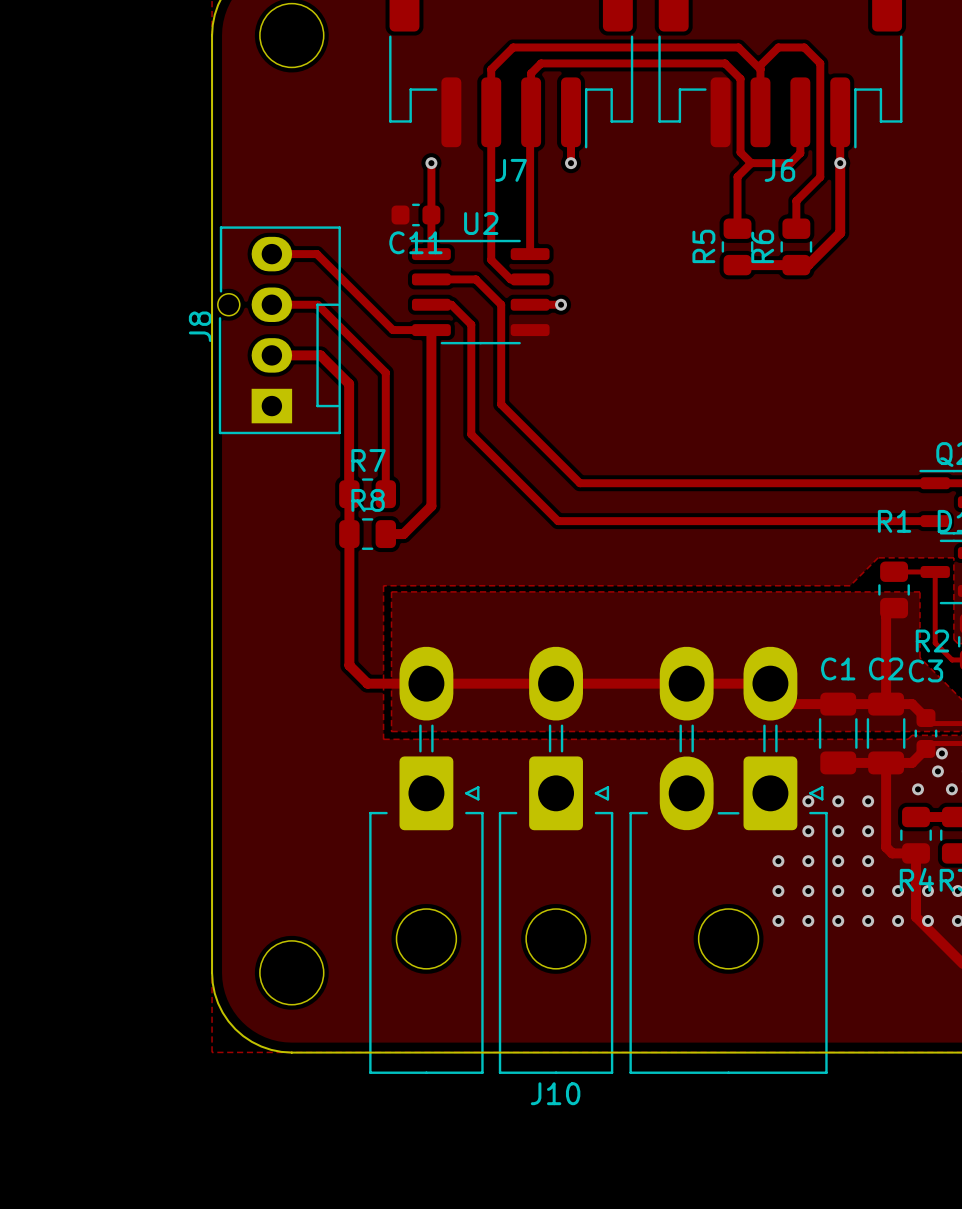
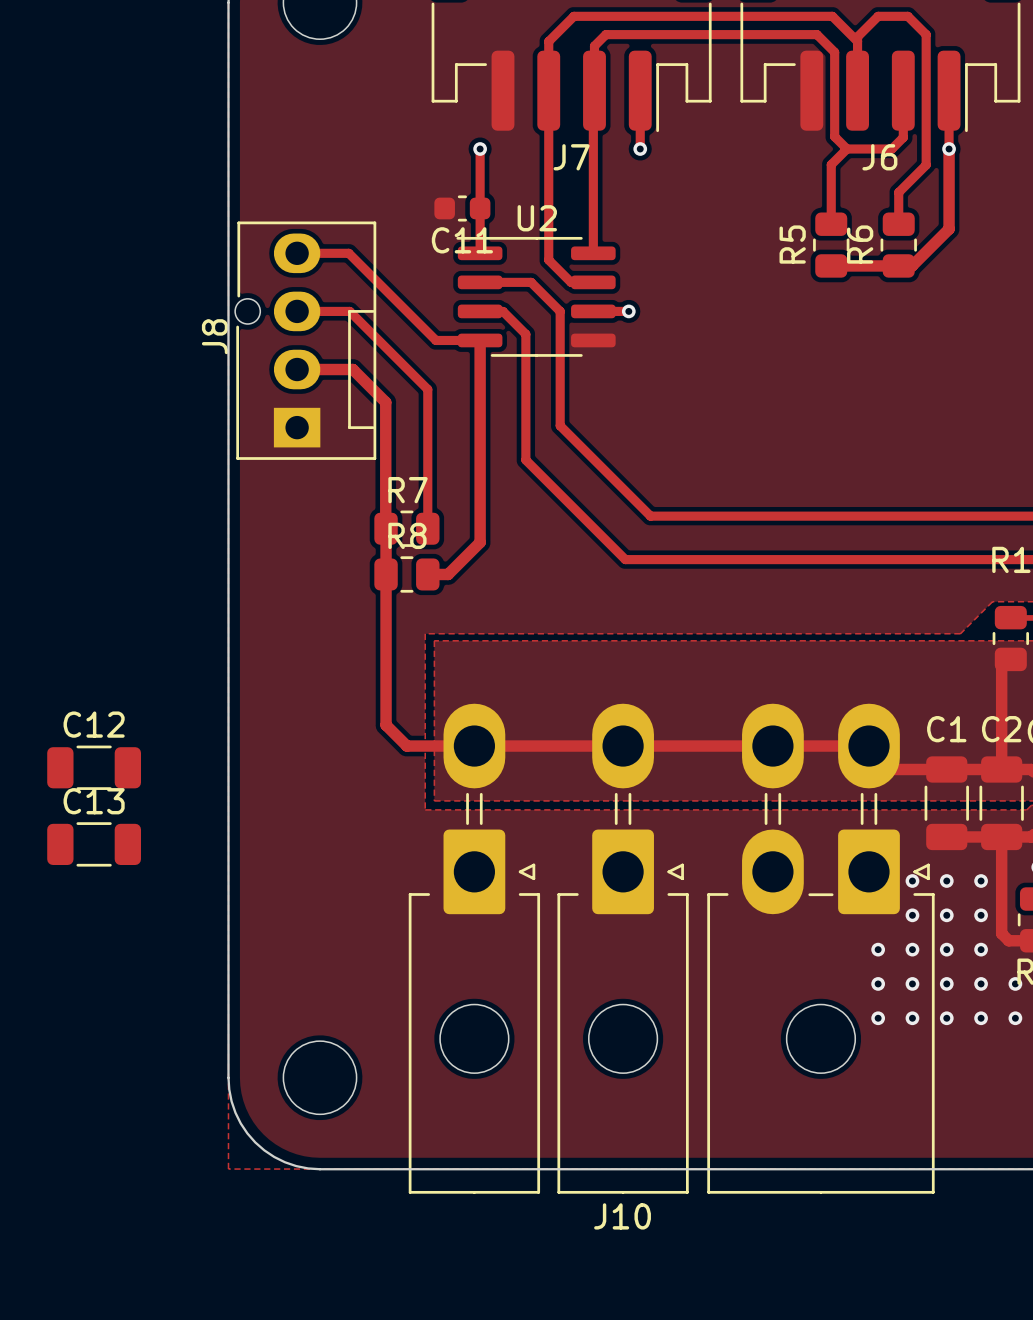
C12: none -> (94, 767)
C13: none -> (94, 844)

